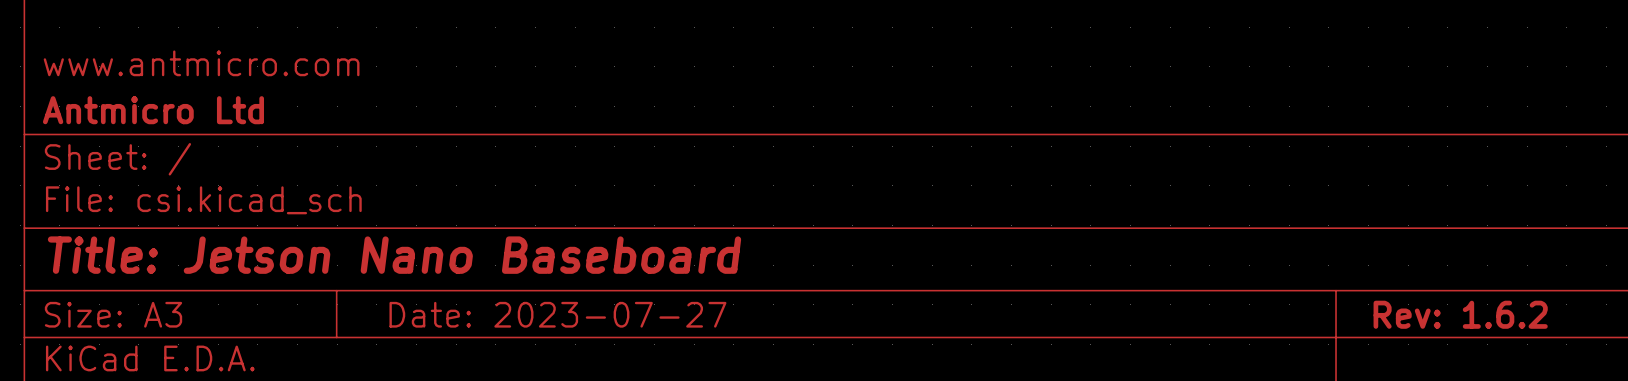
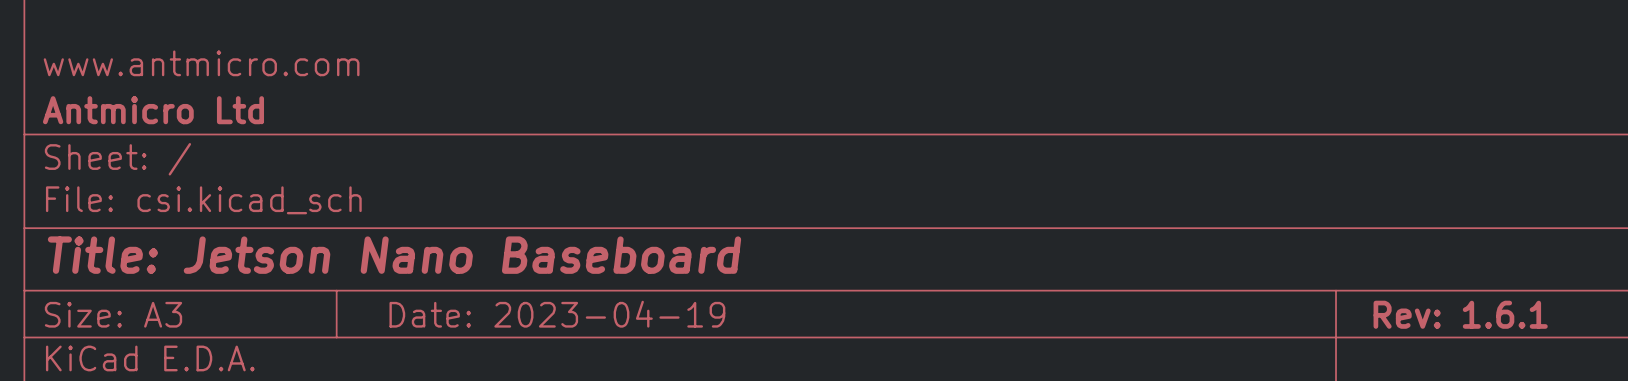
title block: Date: 2023-07-27 (557, 314) -> Date: 2023-04-19 (557, 314)
title block: Rev: 1.6.2 (1460, 314) -> Rev: 1.6.1 (1460, 314)

